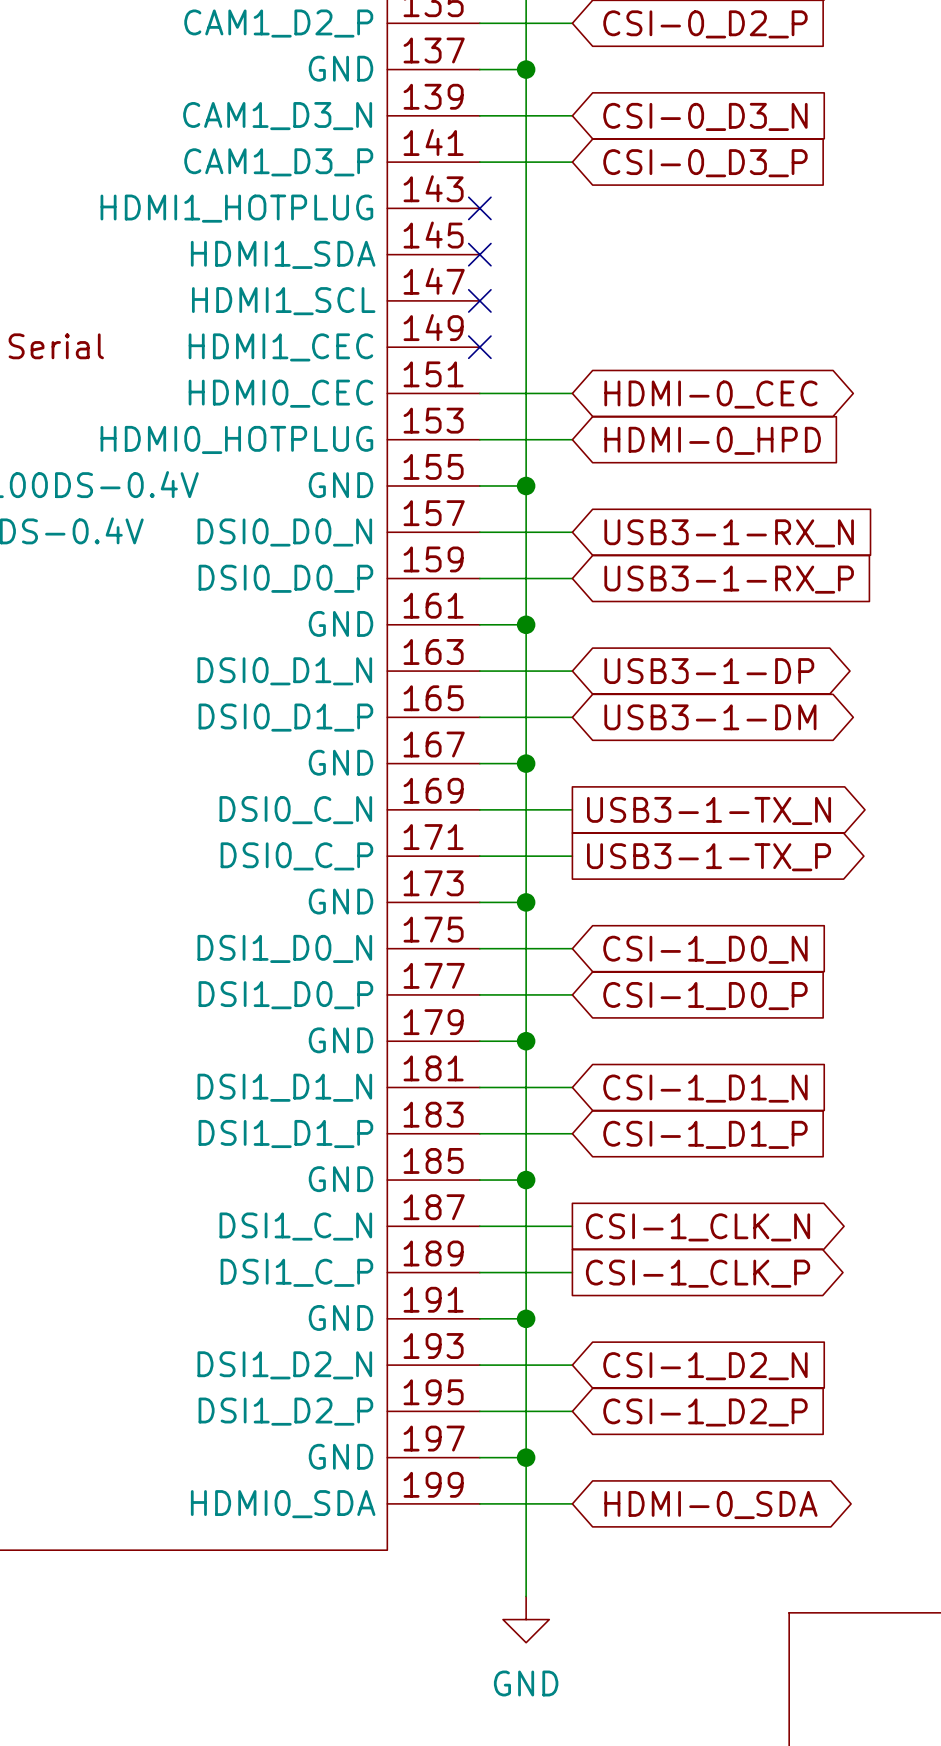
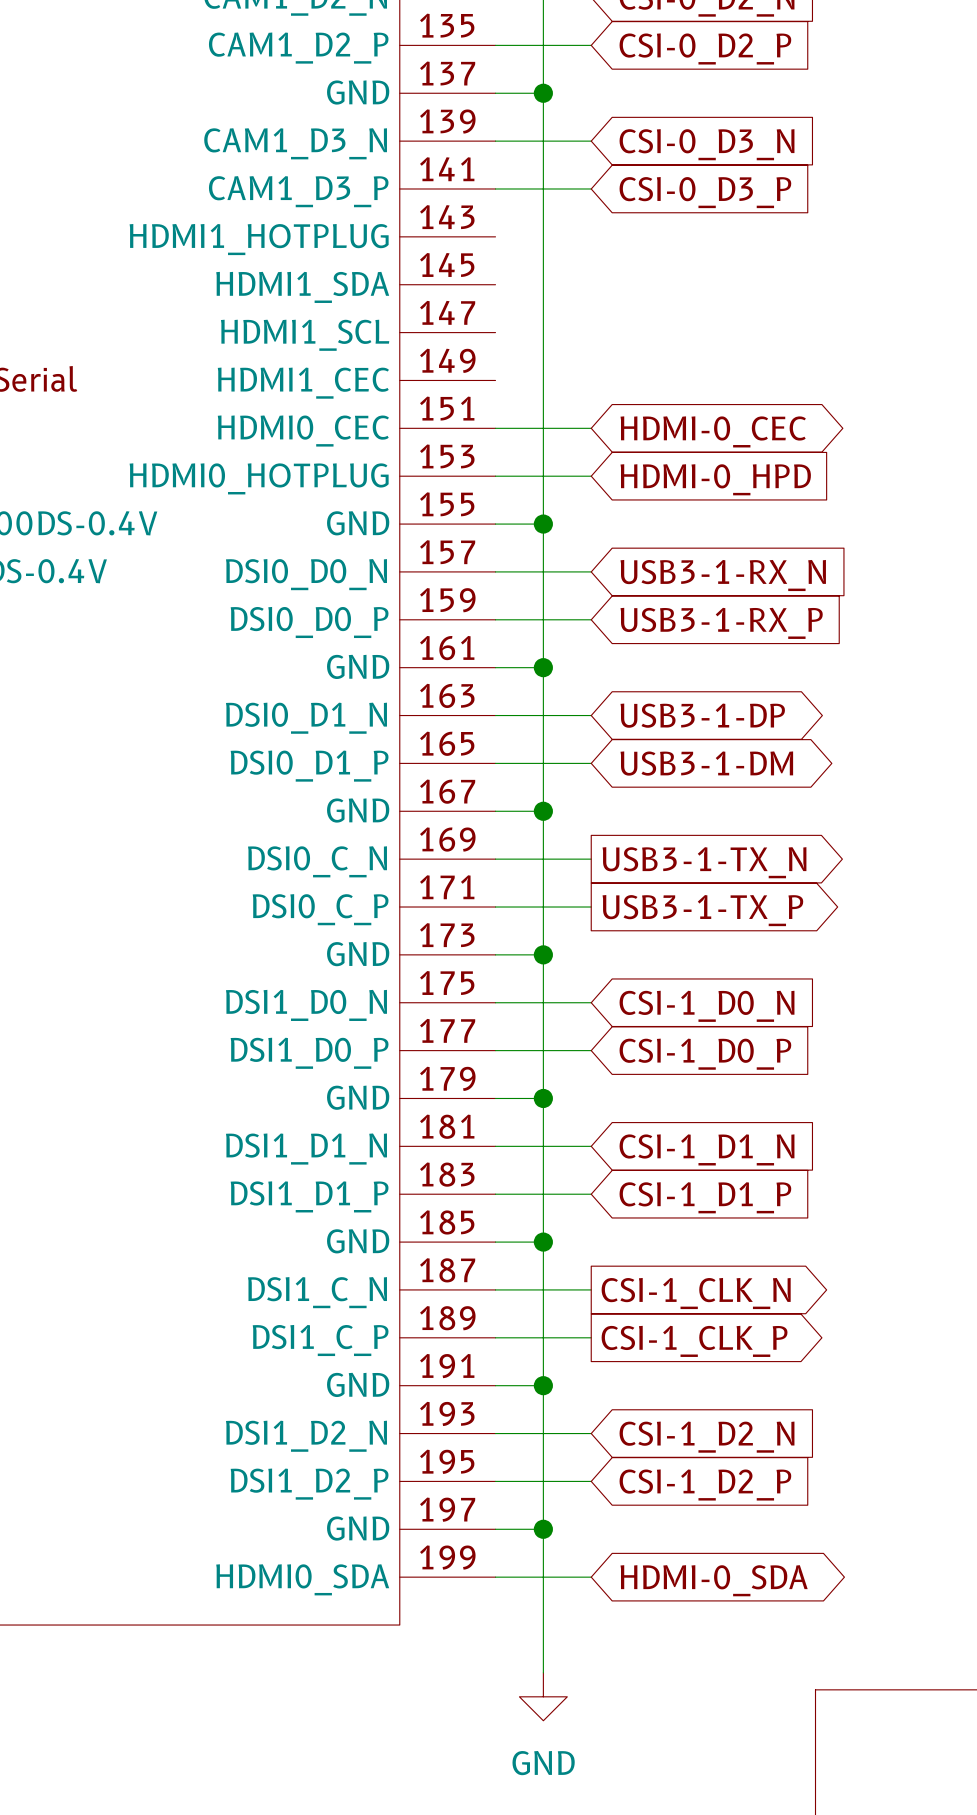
no-connect mark: (479, 208) -> none
no-connect mark: (479, 254) -> none
no-connect mark: (479, 300) -> none
no-connect mark: (479, 347) -> none

